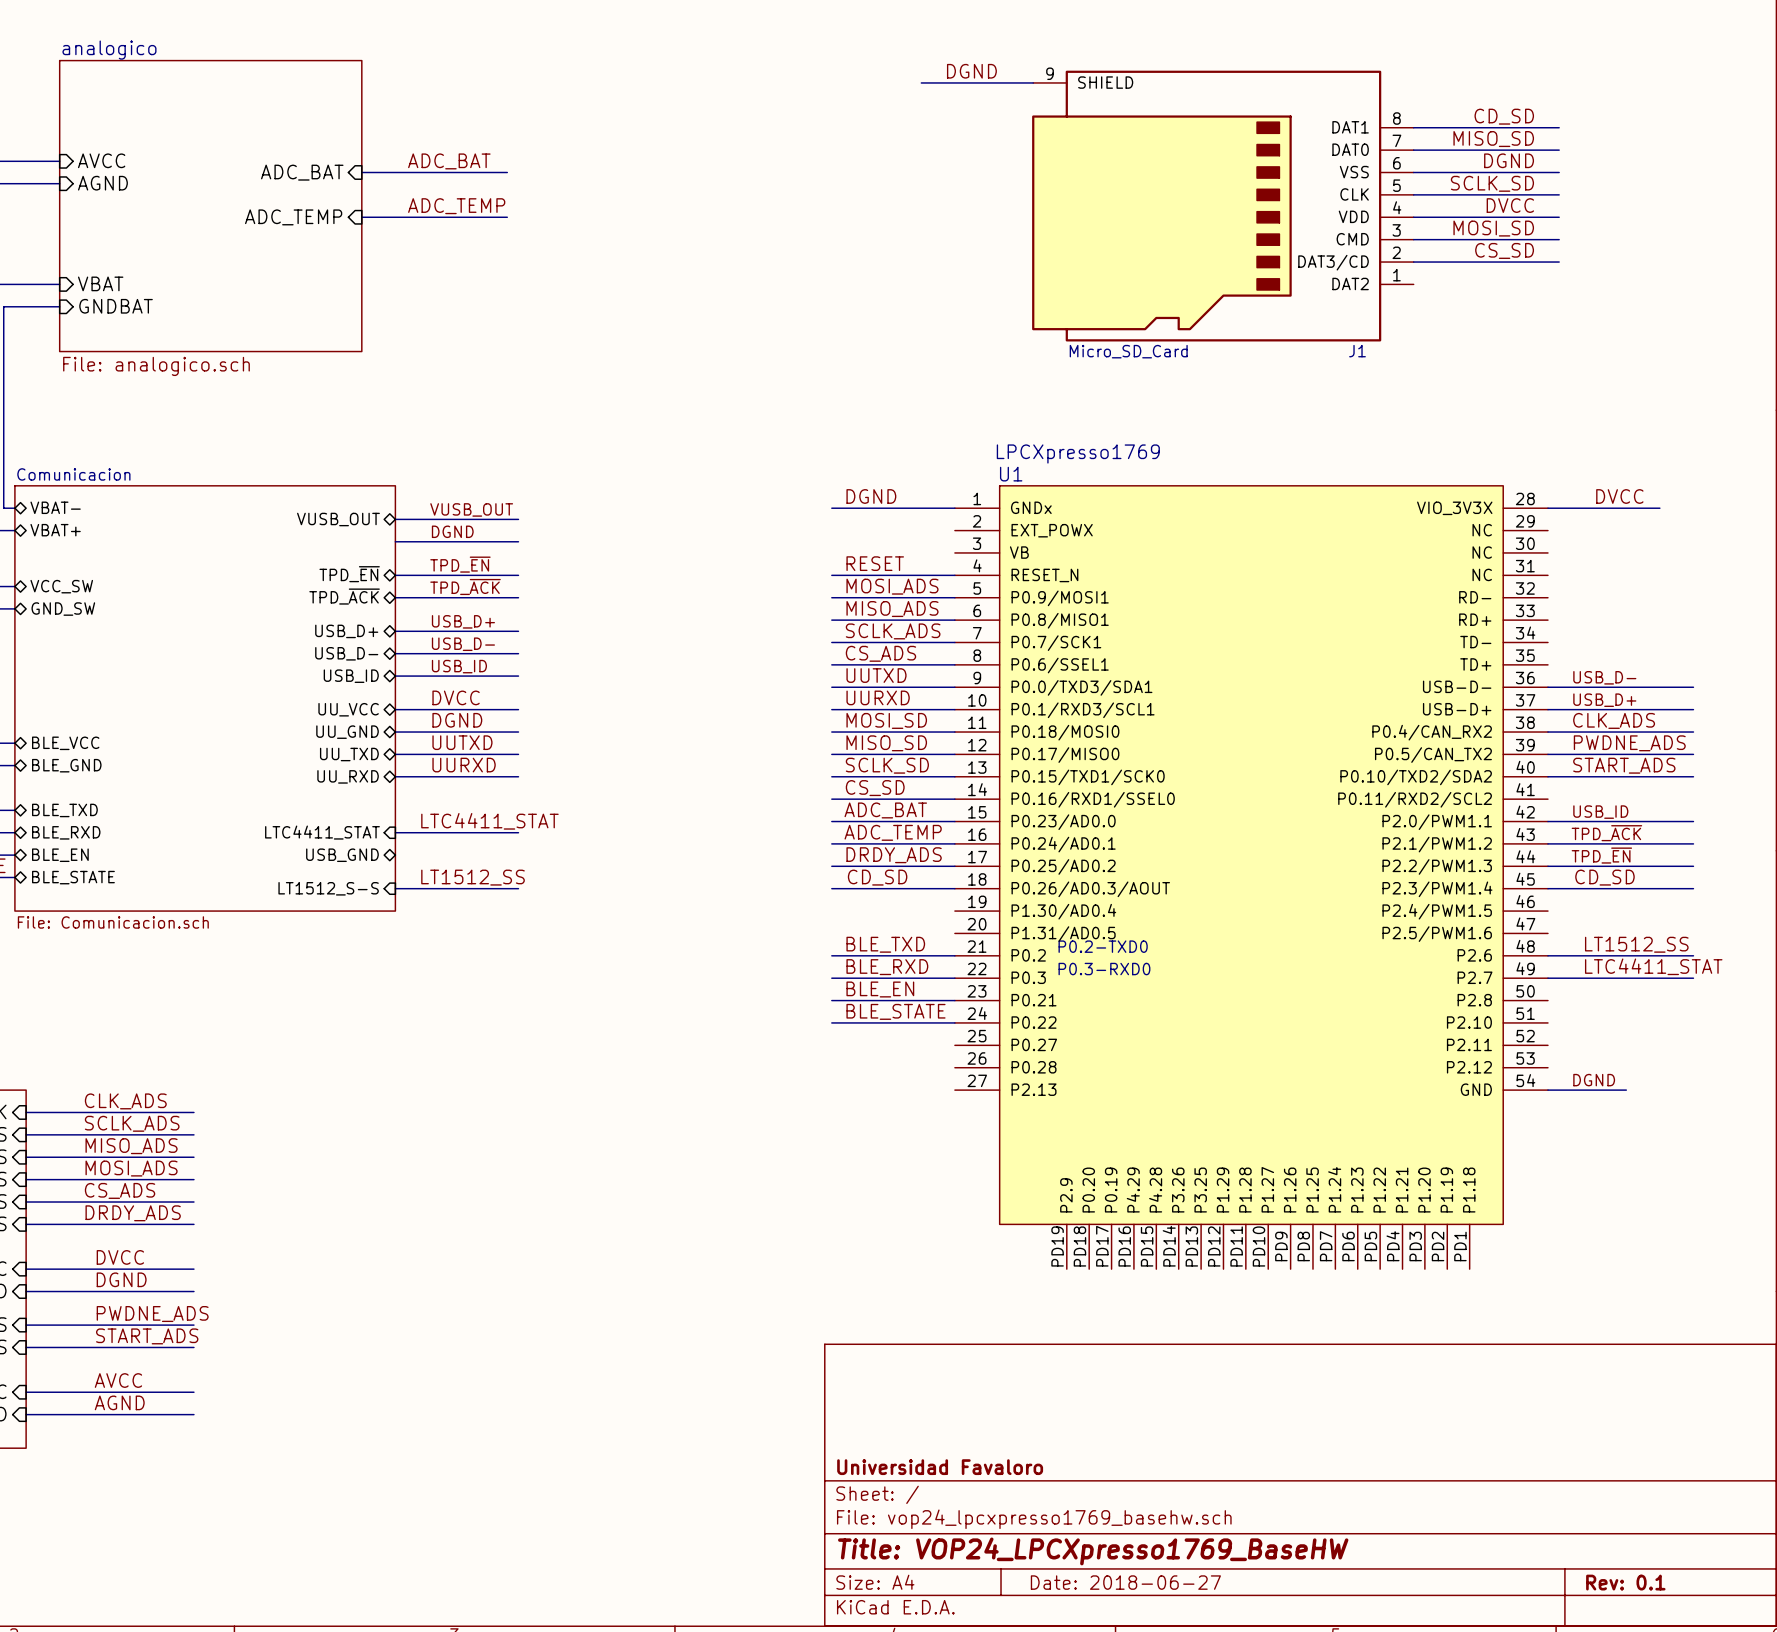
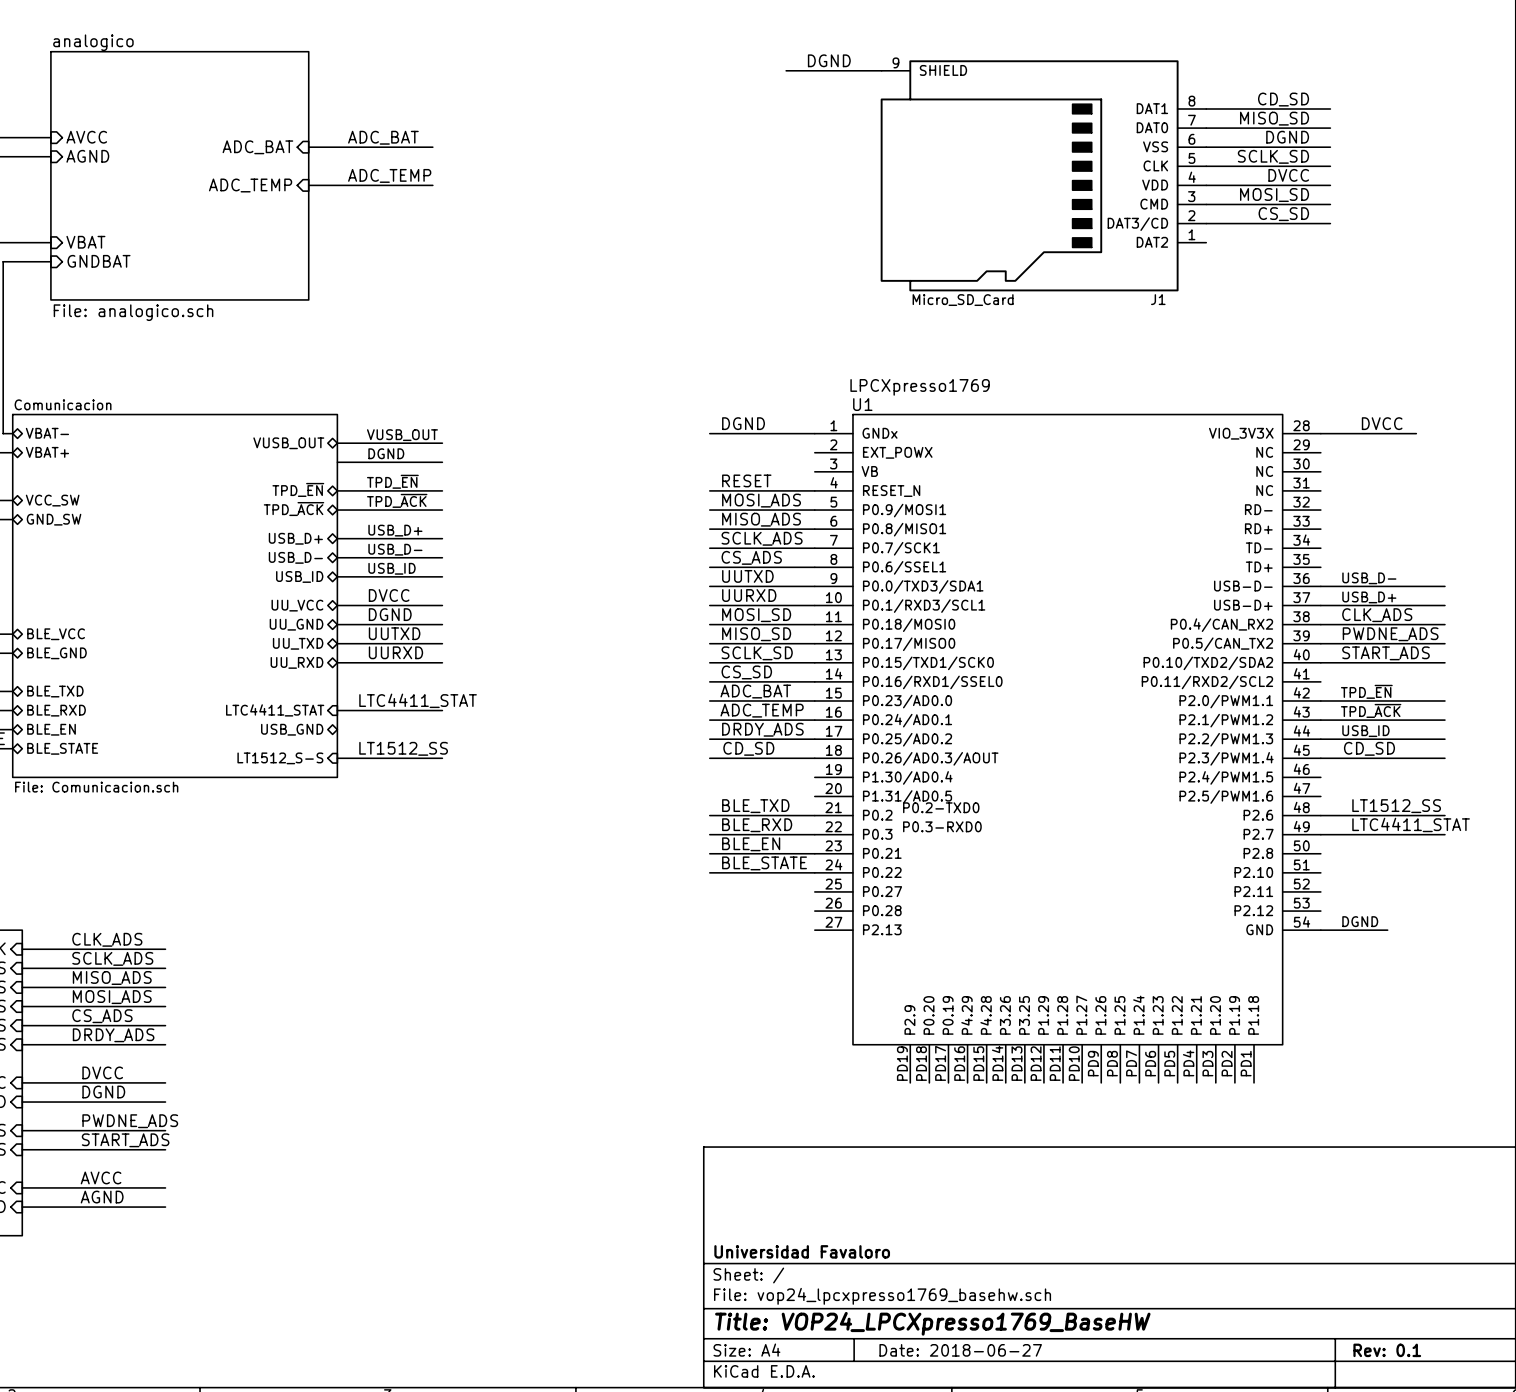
label: USB_ID (1600, 812) -> TPD_~{EN} (1366, 691)
label: TPD_~{EN} (1601, 855) -> USB_ID (1365, 731)

